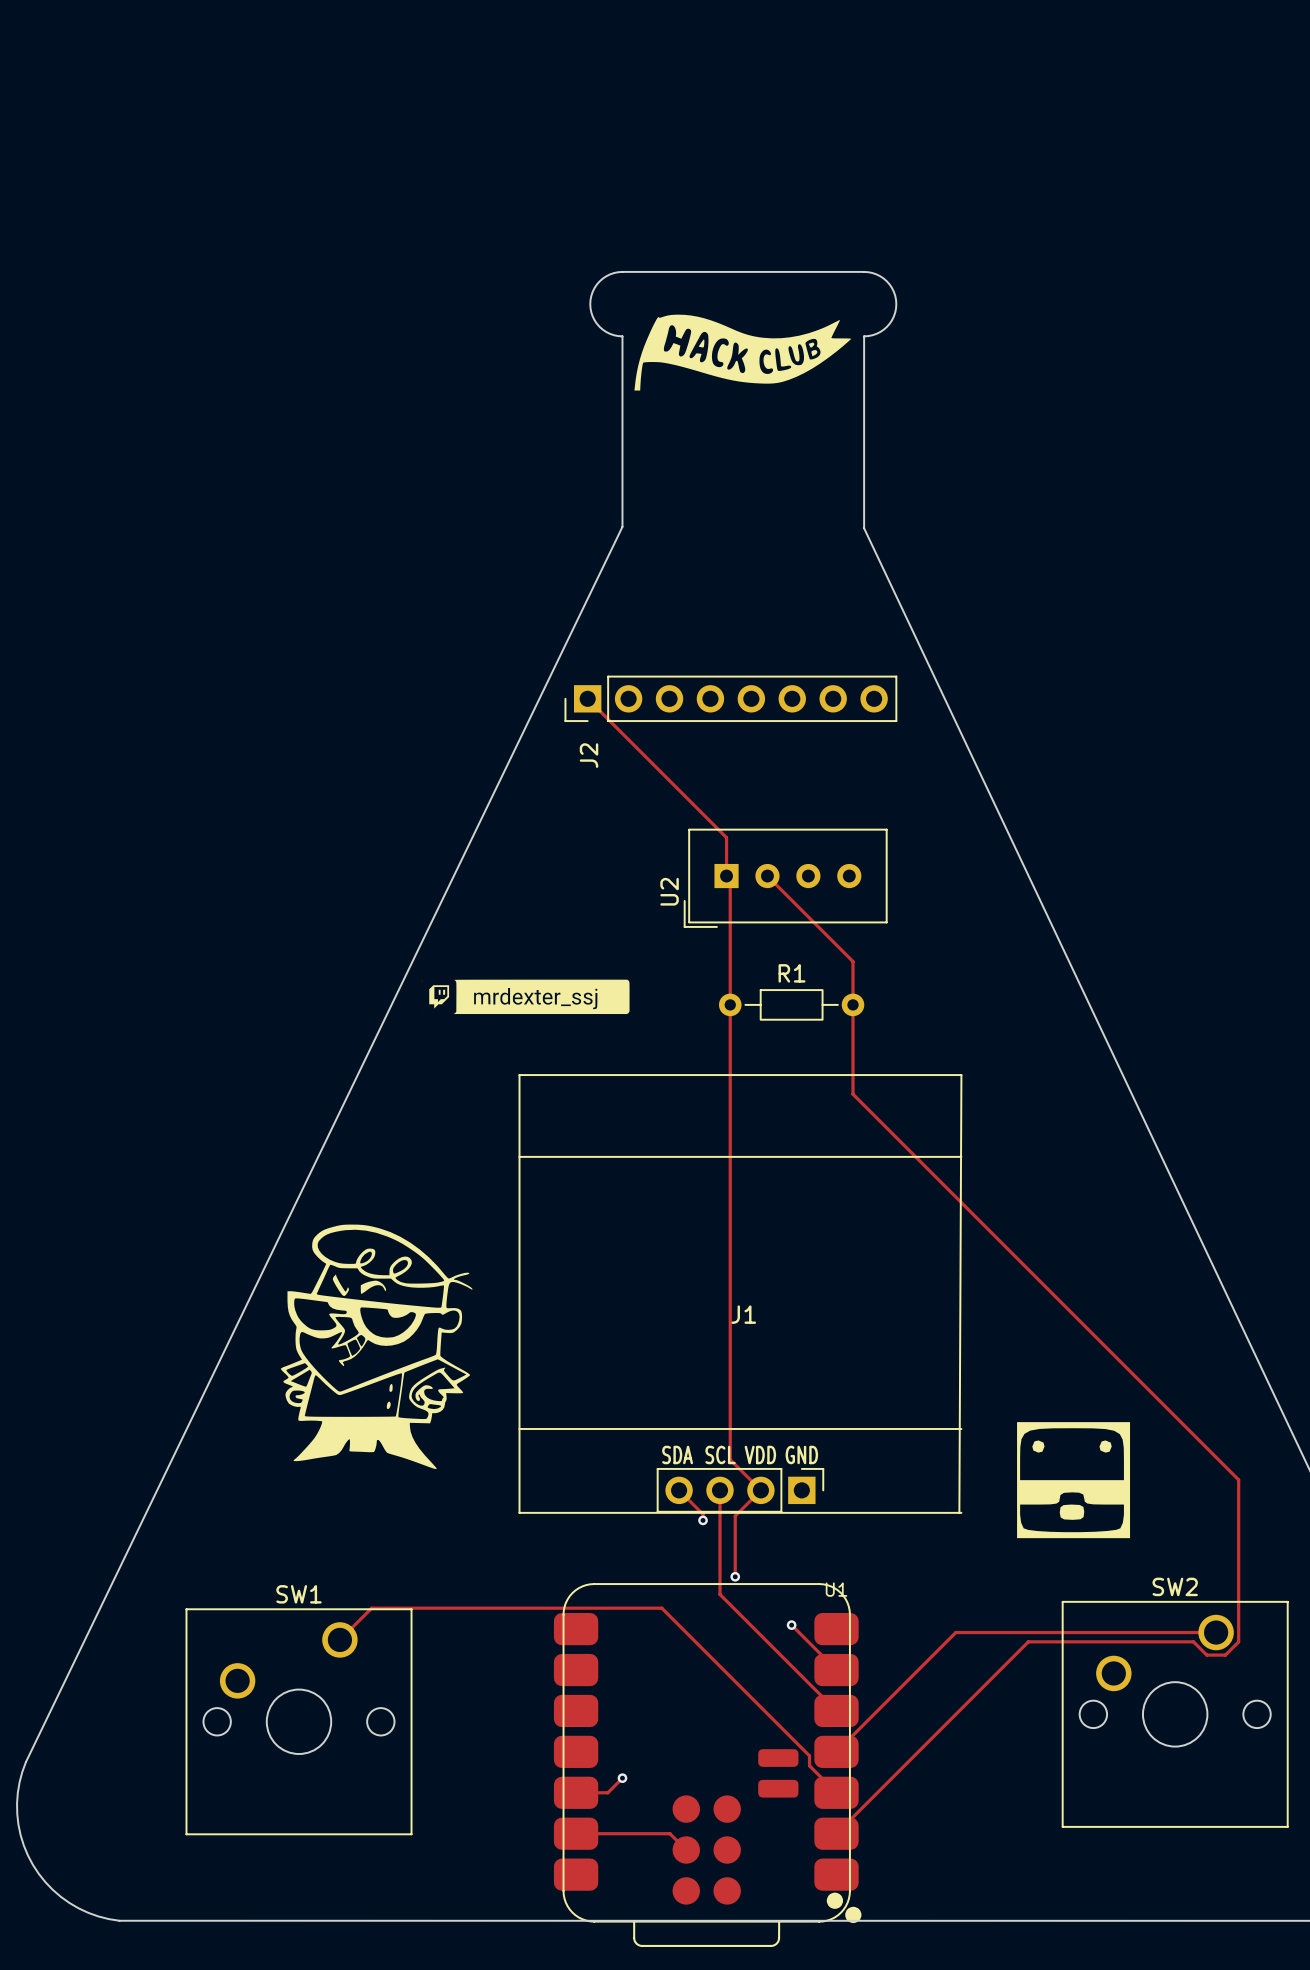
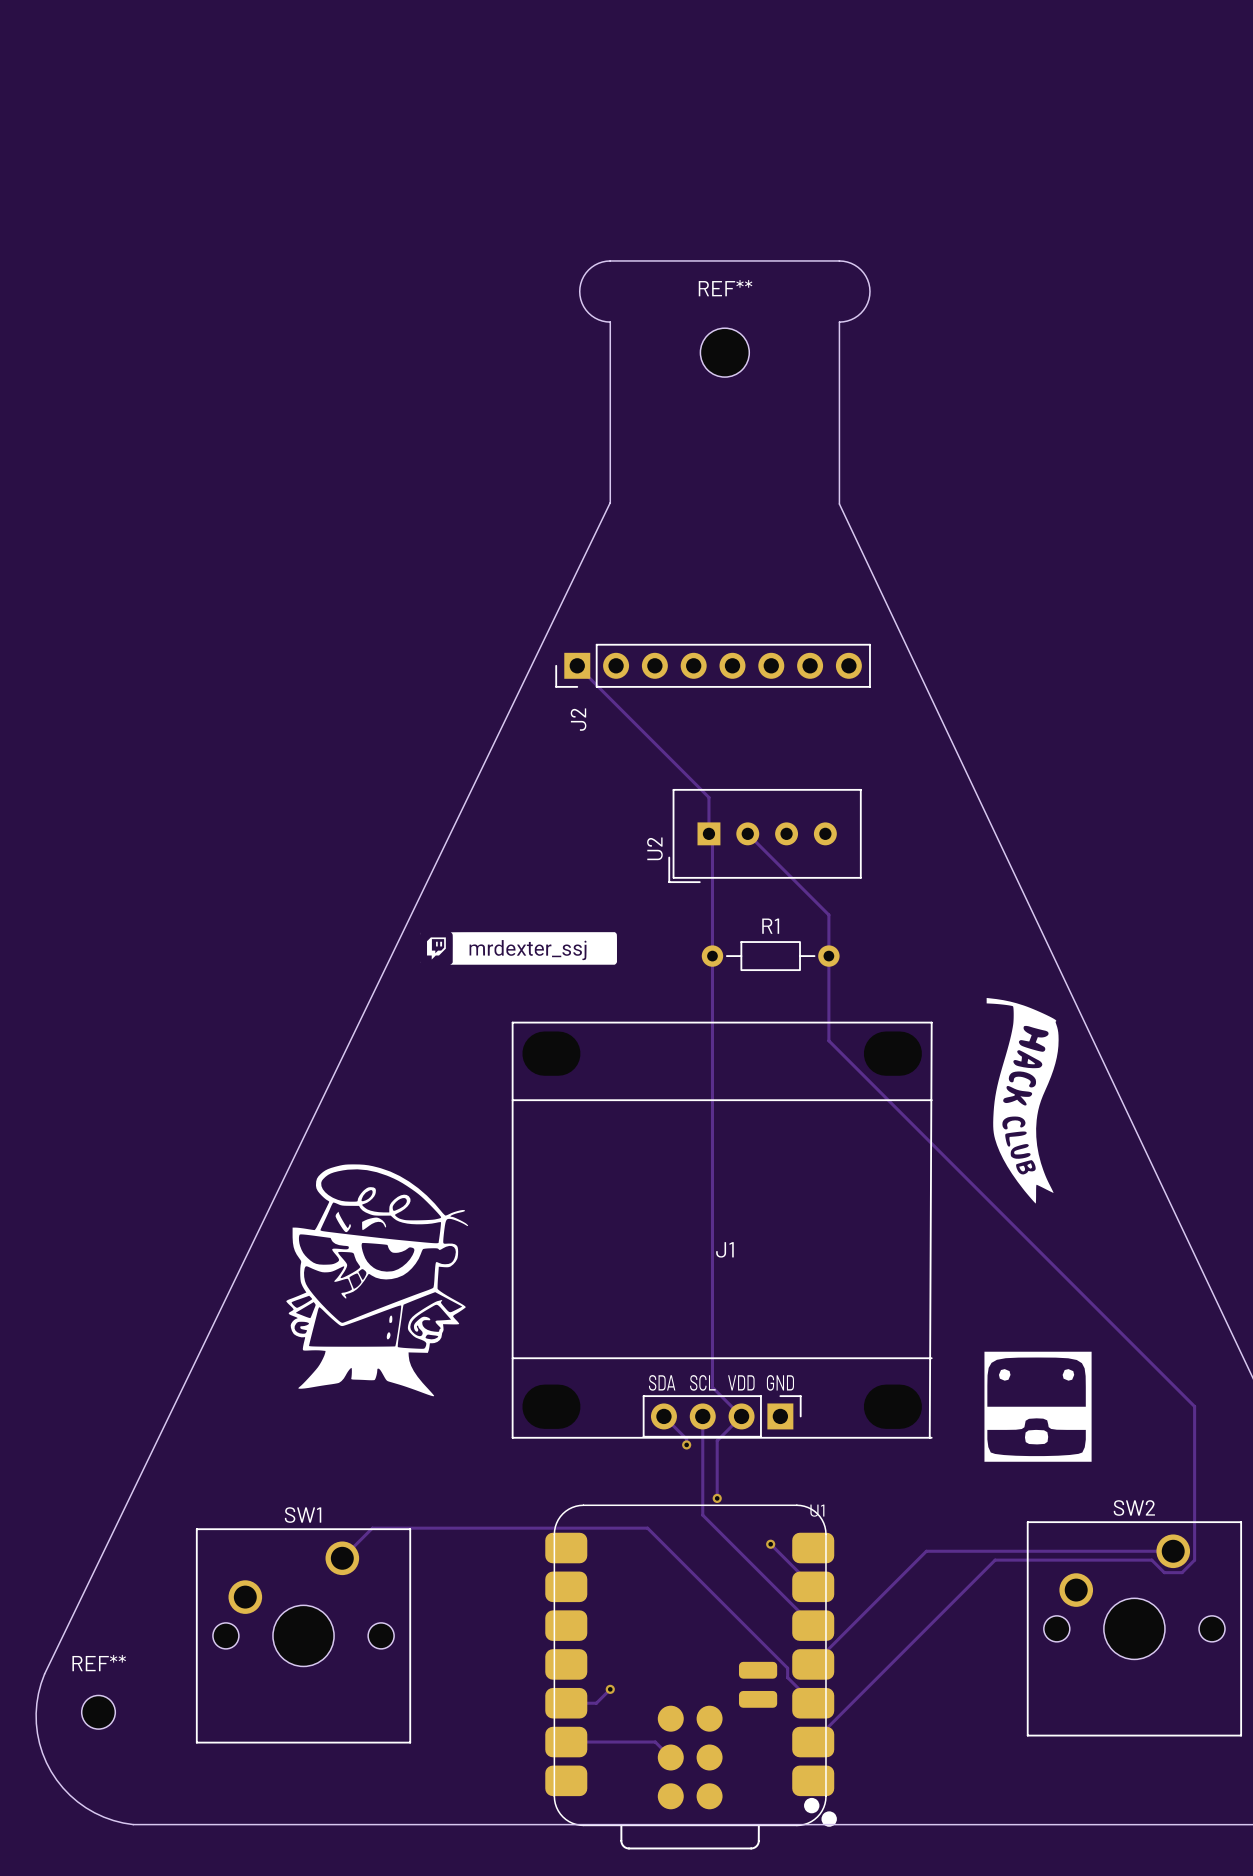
drawing: [634, 314, 852, 391] -> none
REF**: none -> (724, 352)
drawing: none -> [986, 997, 1059, 1204]
REF**: none -> (98, 1712)

